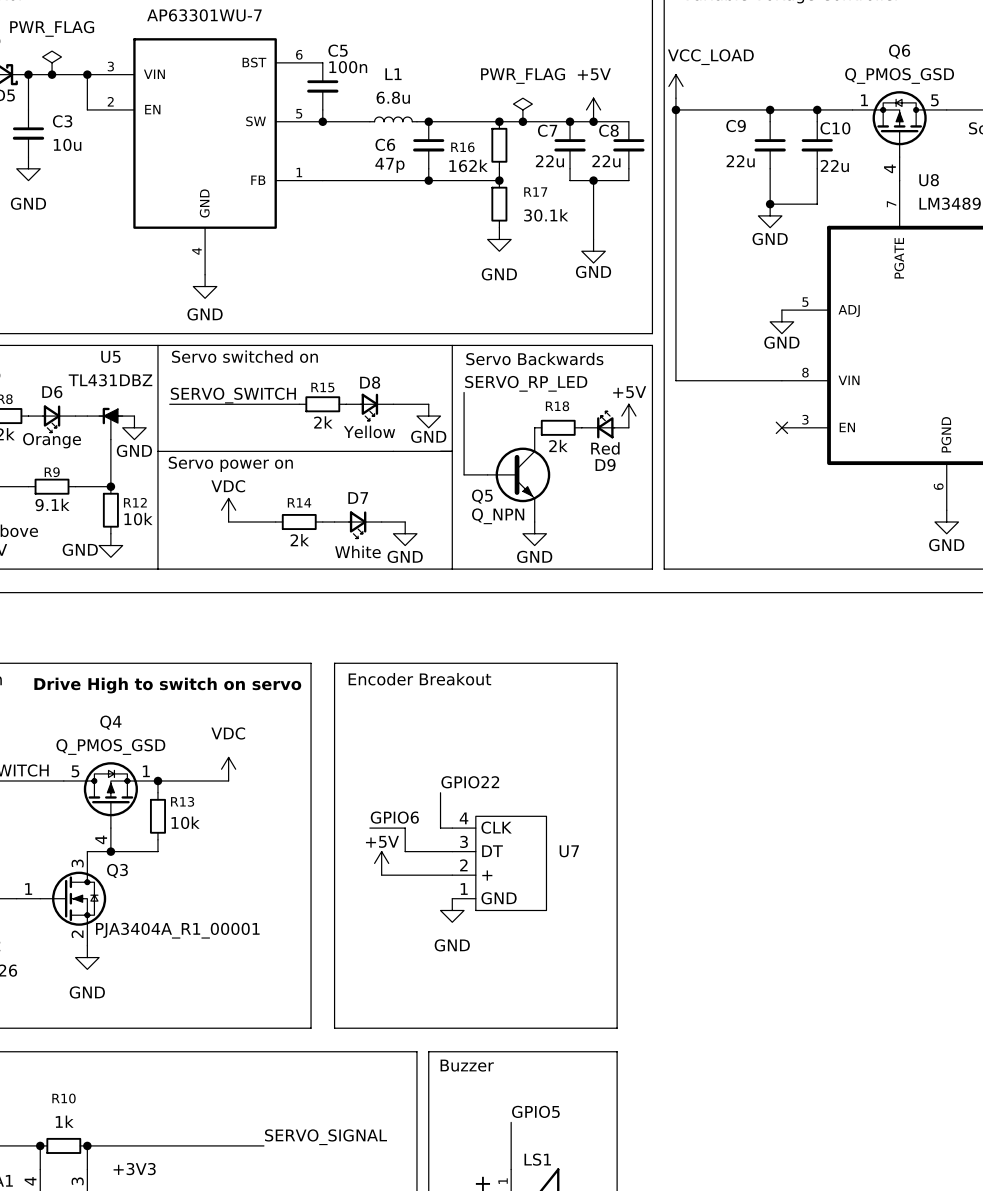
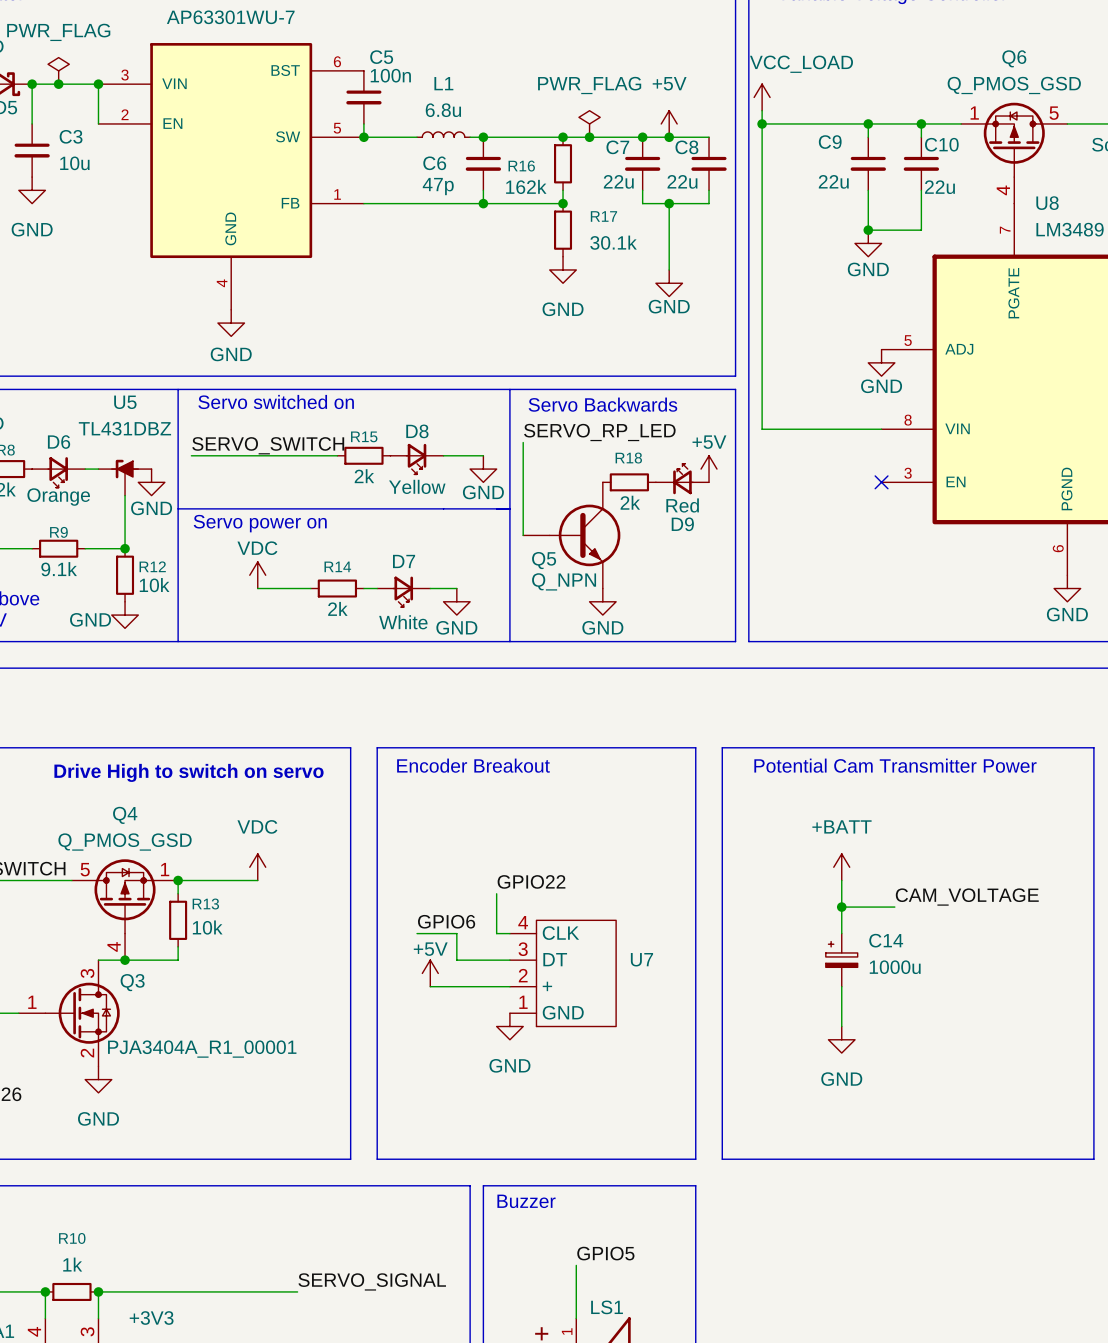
line: none -> (722, 747) (1093, 747) (1093, 1159) (722, 1159) (722, 747)
text: none -> Potential Cam Transmitter Power (895, 765)
power symbol: none -> +BATT (841, 867)
wire: none -> (841, 880) (841, 933)
label: none -> CAM_VOLTAGE (967, 897)
wire: none -> (841, 907) (894, 907)
junction: none -> (841, 907)
C14: none -> 1000u (841, 960)
wire: none -> (841, 986) (841, 1026)
power symbol: none -> GND (841, 1039)

